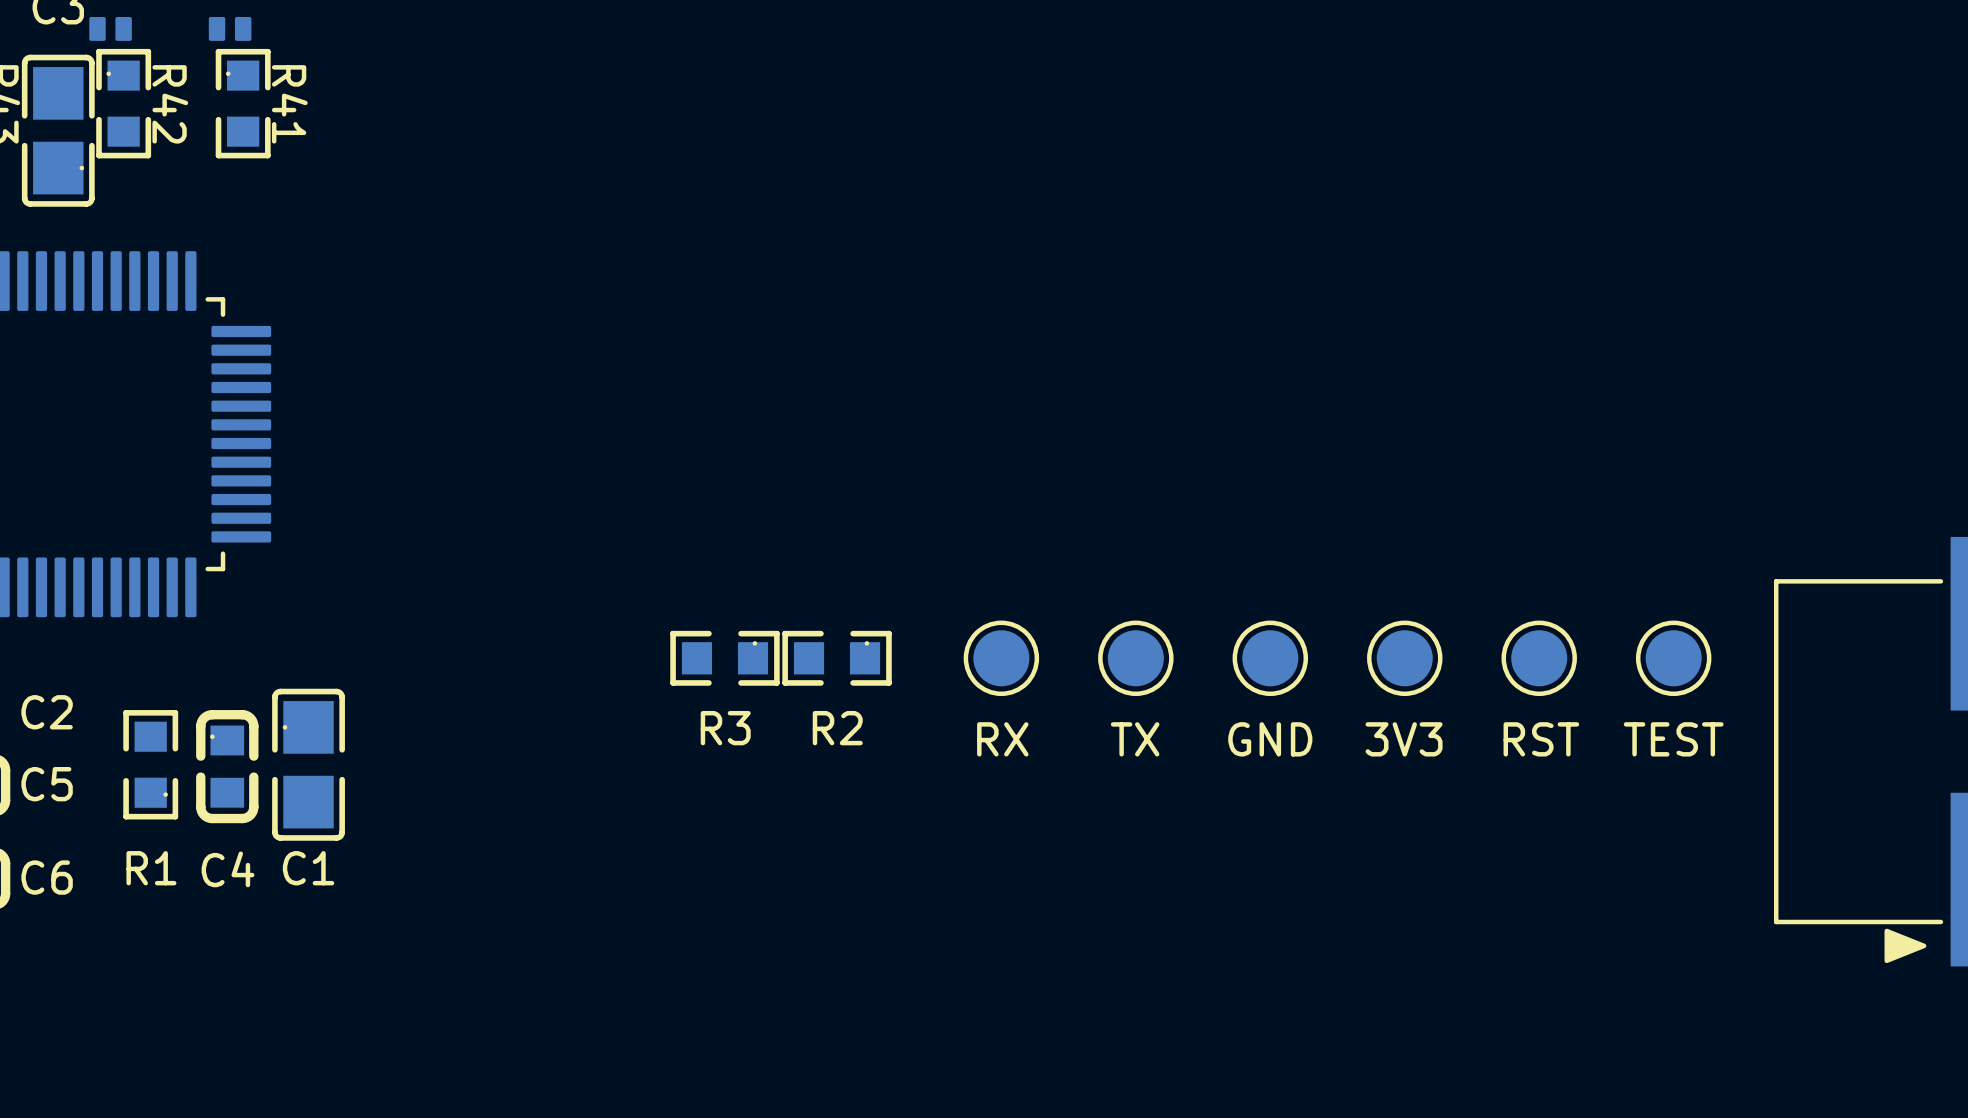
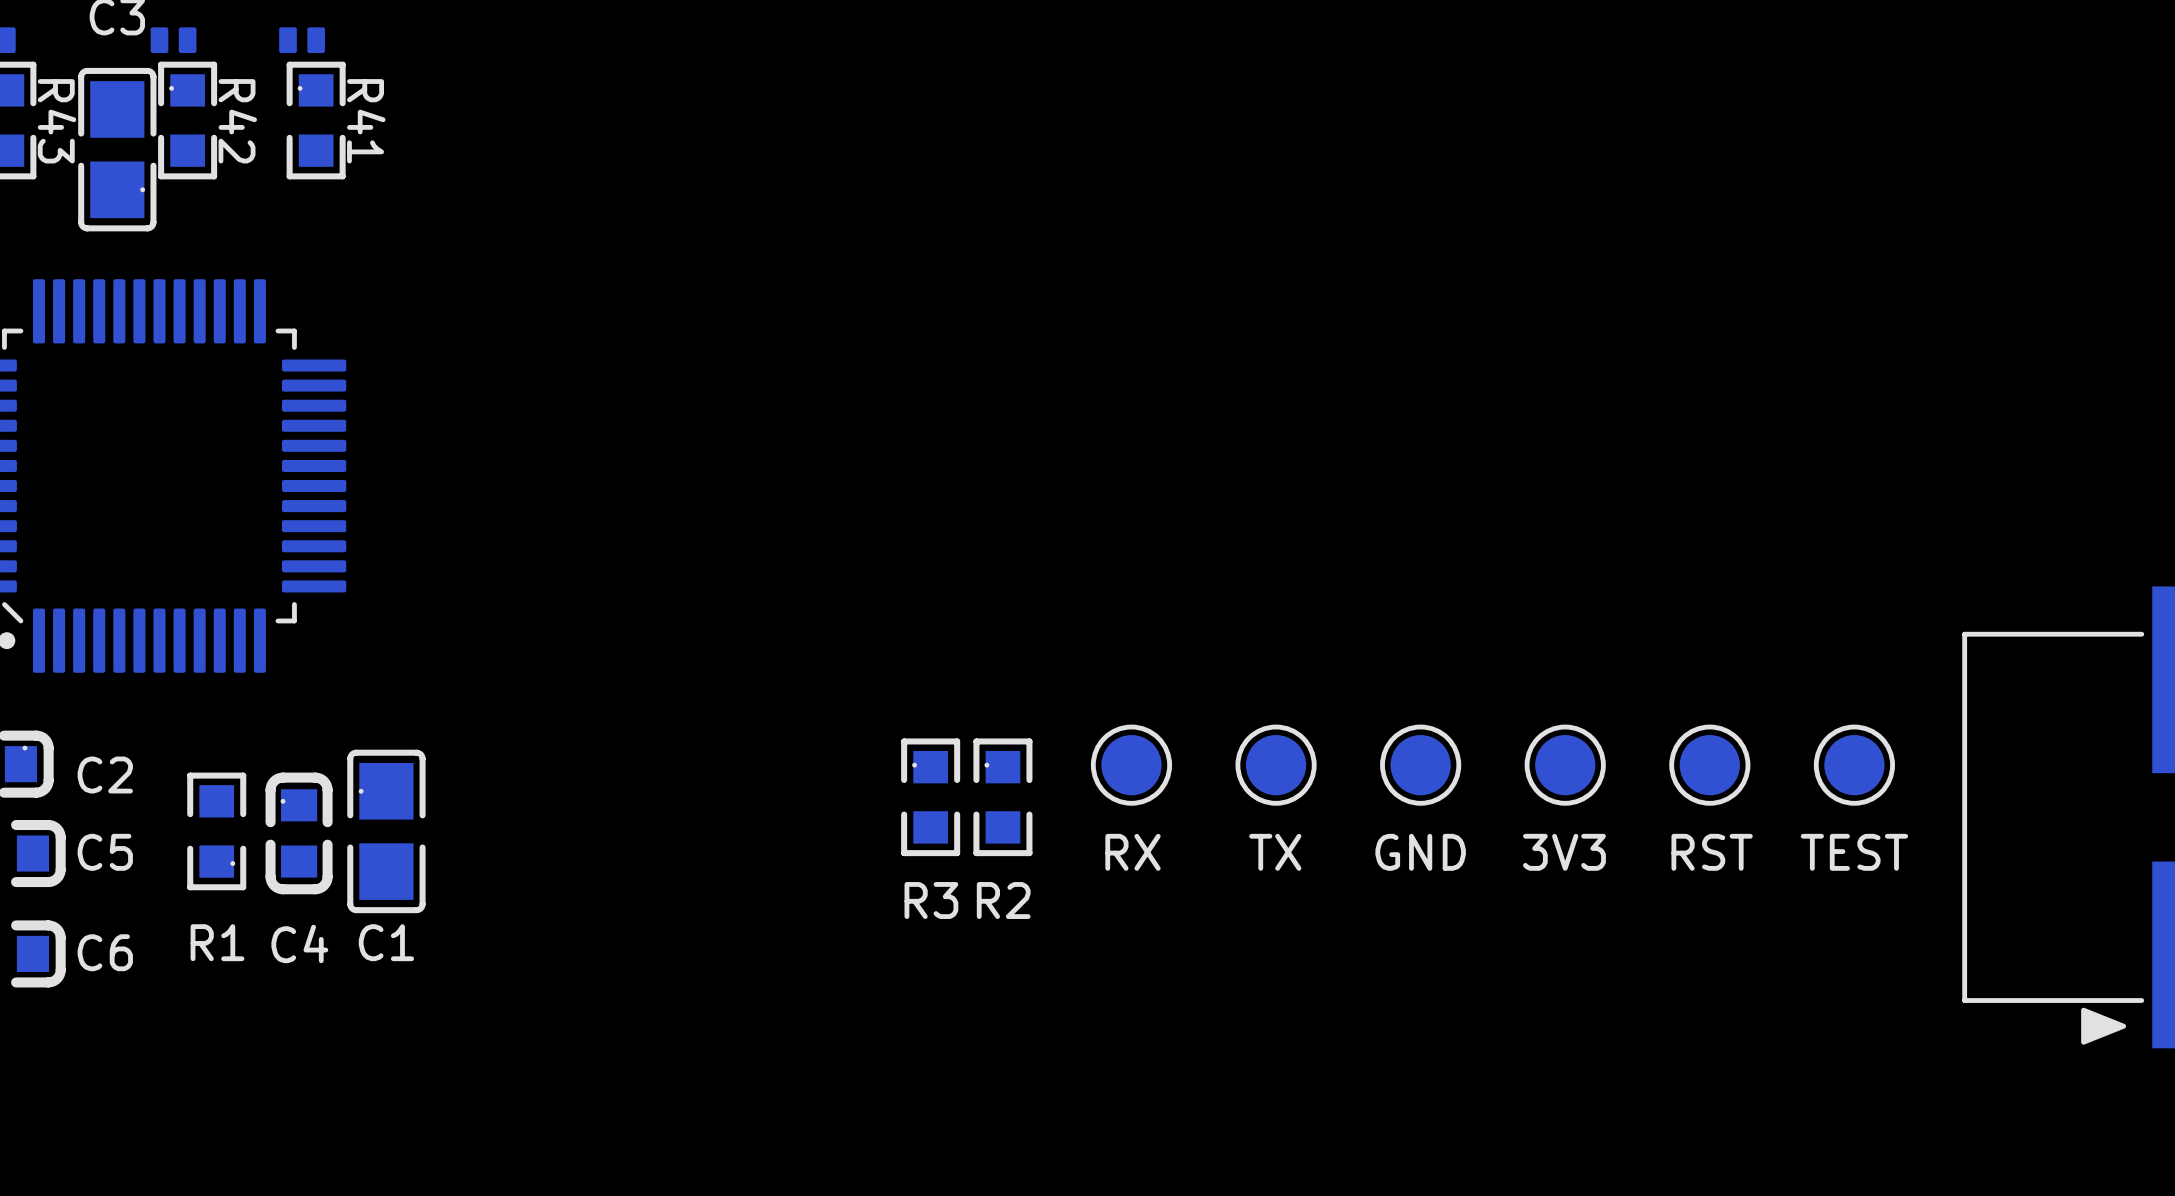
R3 rotation: 0° (724, 658) -> 90° counterclockwise (930, 797)
R3 position: (724, 658) -> (930, 797)
R2 rotation: 0° (837, 658) -> 90° counterclockwise (1002, 797)
R2 position: (837, 658) -> (1002, 797)
part position: (1001, 658) -> (1131, 765)
part position: (1135, 658) -> (1276, 765)
part position: (1270, 658) -> (1420, 765)
part position: (1404, 658) -> (1565, 765)
part position: (1539, 658) -> (1709, 765)
part position: (1673, 658) -> (1854, 765)

